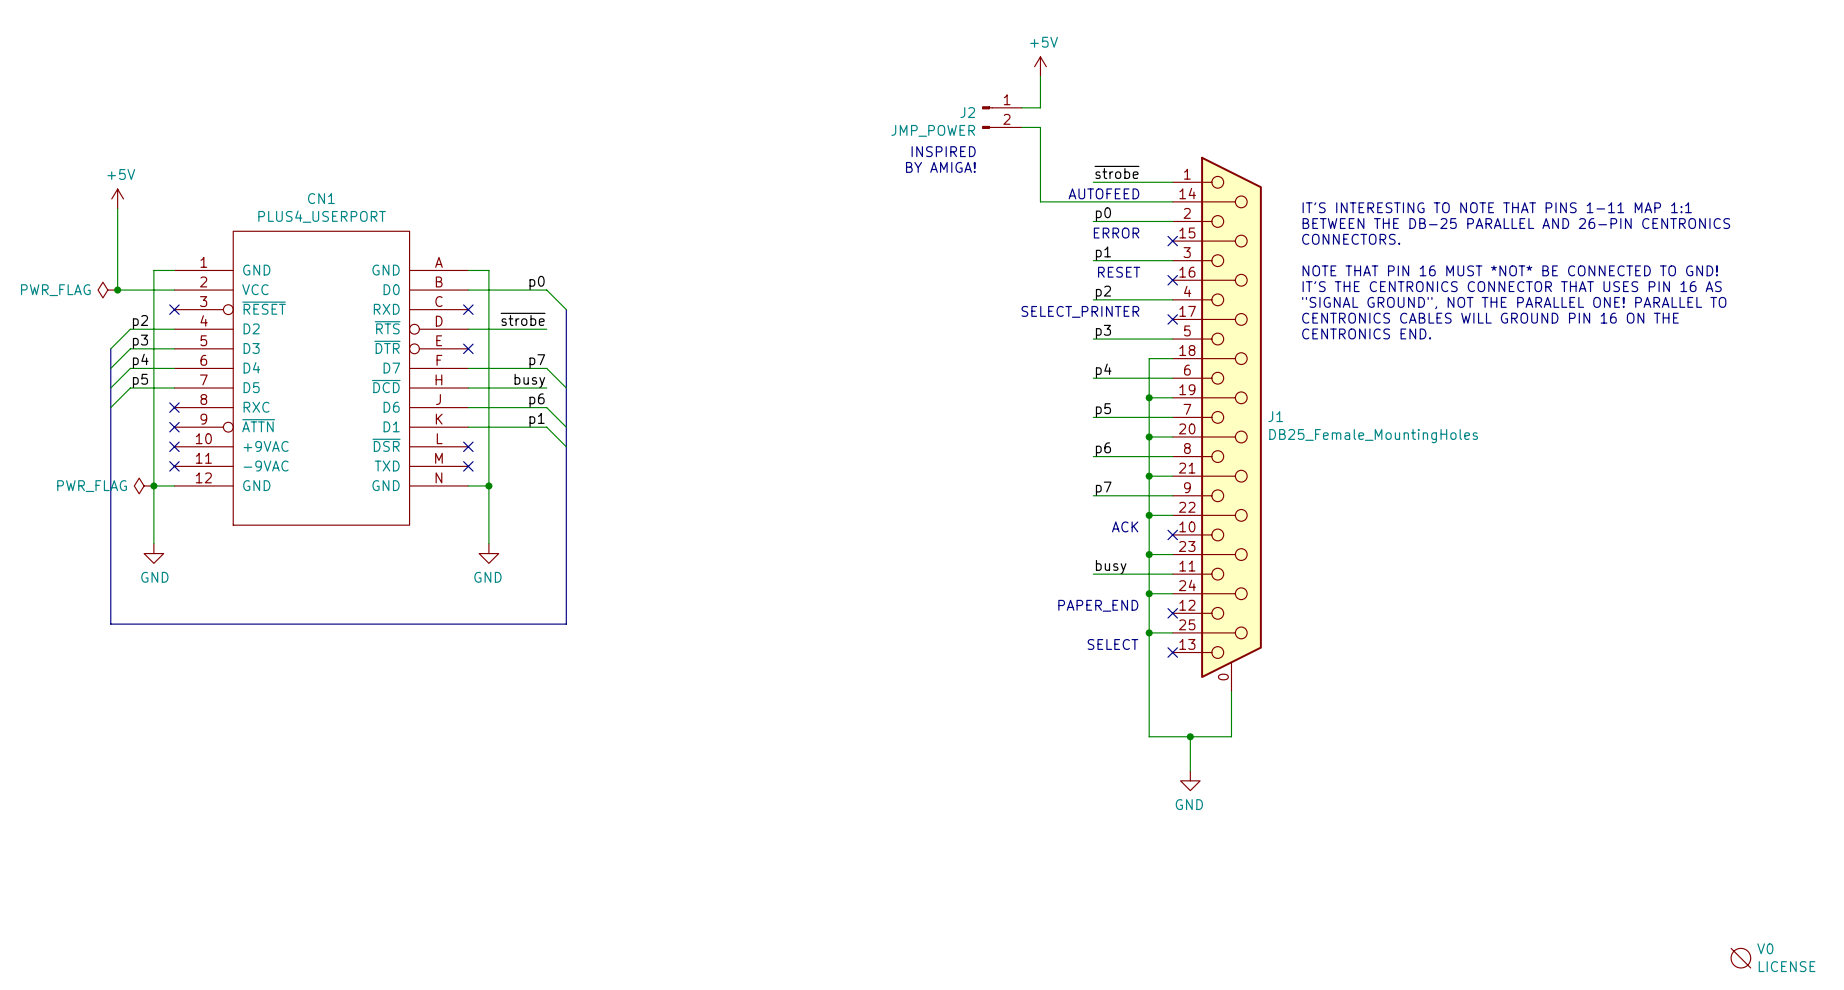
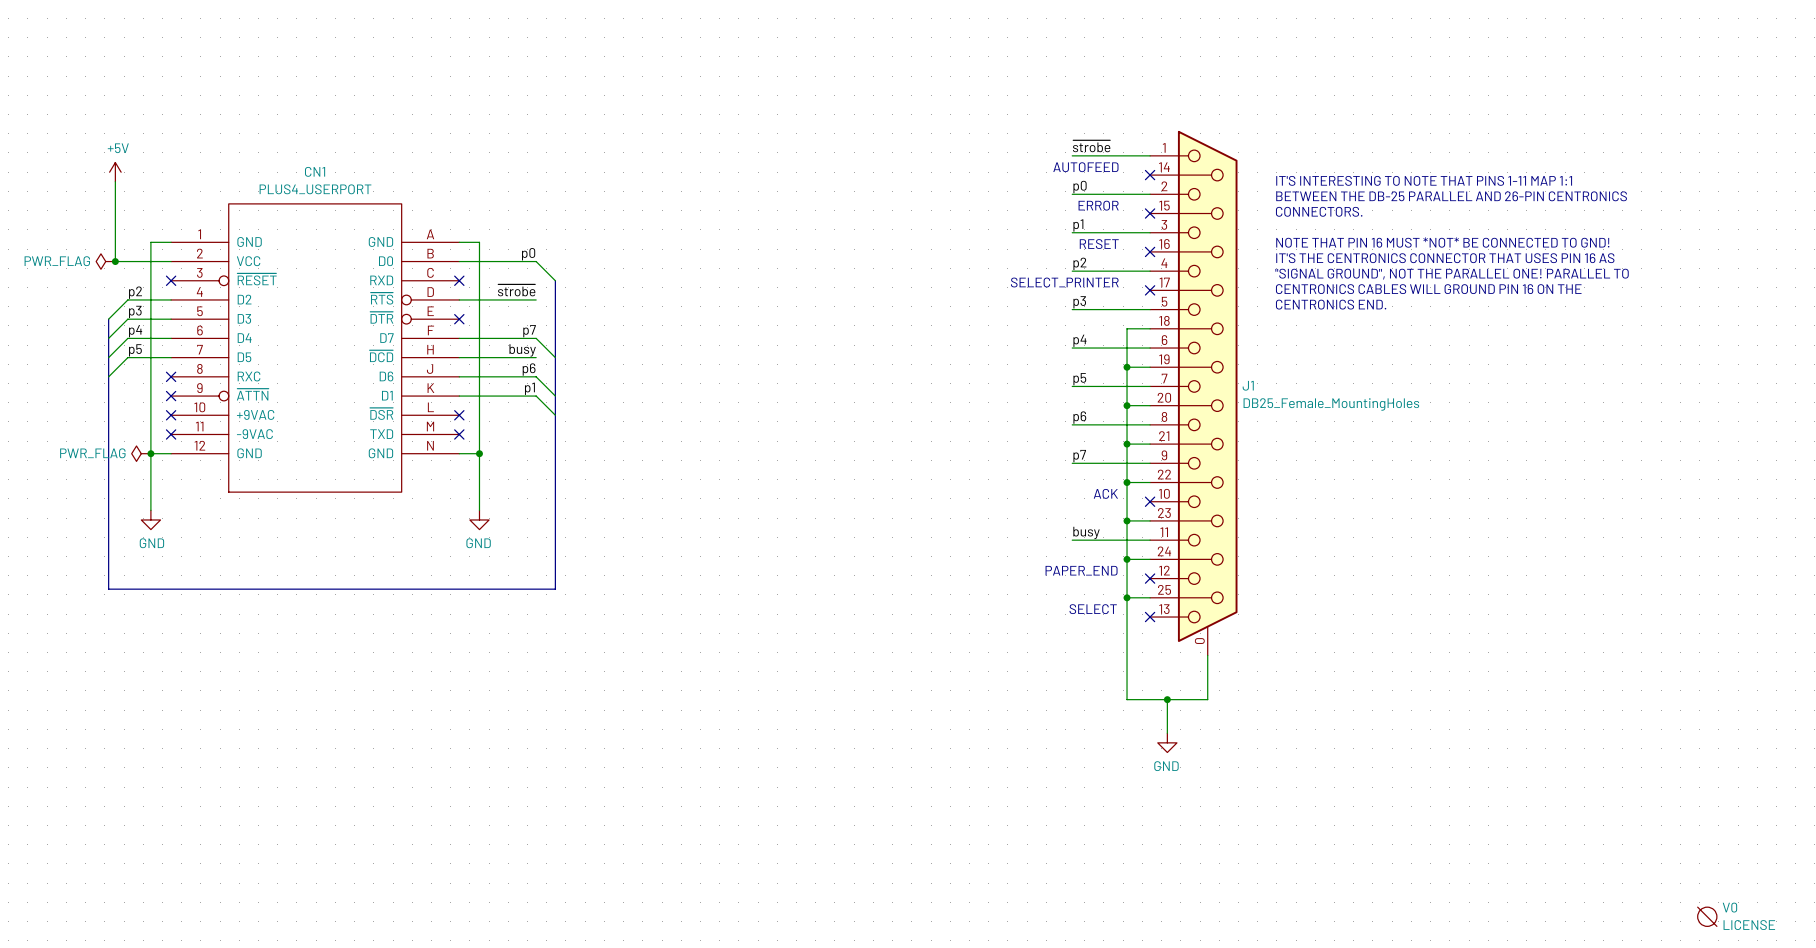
power symbol: +5V (1040, 66) -> none
wire: (1040, 76) (1040, 107) (1021, 107) -> none
J2: JMP_POWER (1001, 117) -> none
wire: (1021, 127) (1040, 127) (1040, 201) (1172, 201) -> none
text: INSPIRED (943, 151) -> none
text: BY AMIGA! (940, 167) -> none
no-connect mark: none -> (1150, 175)

